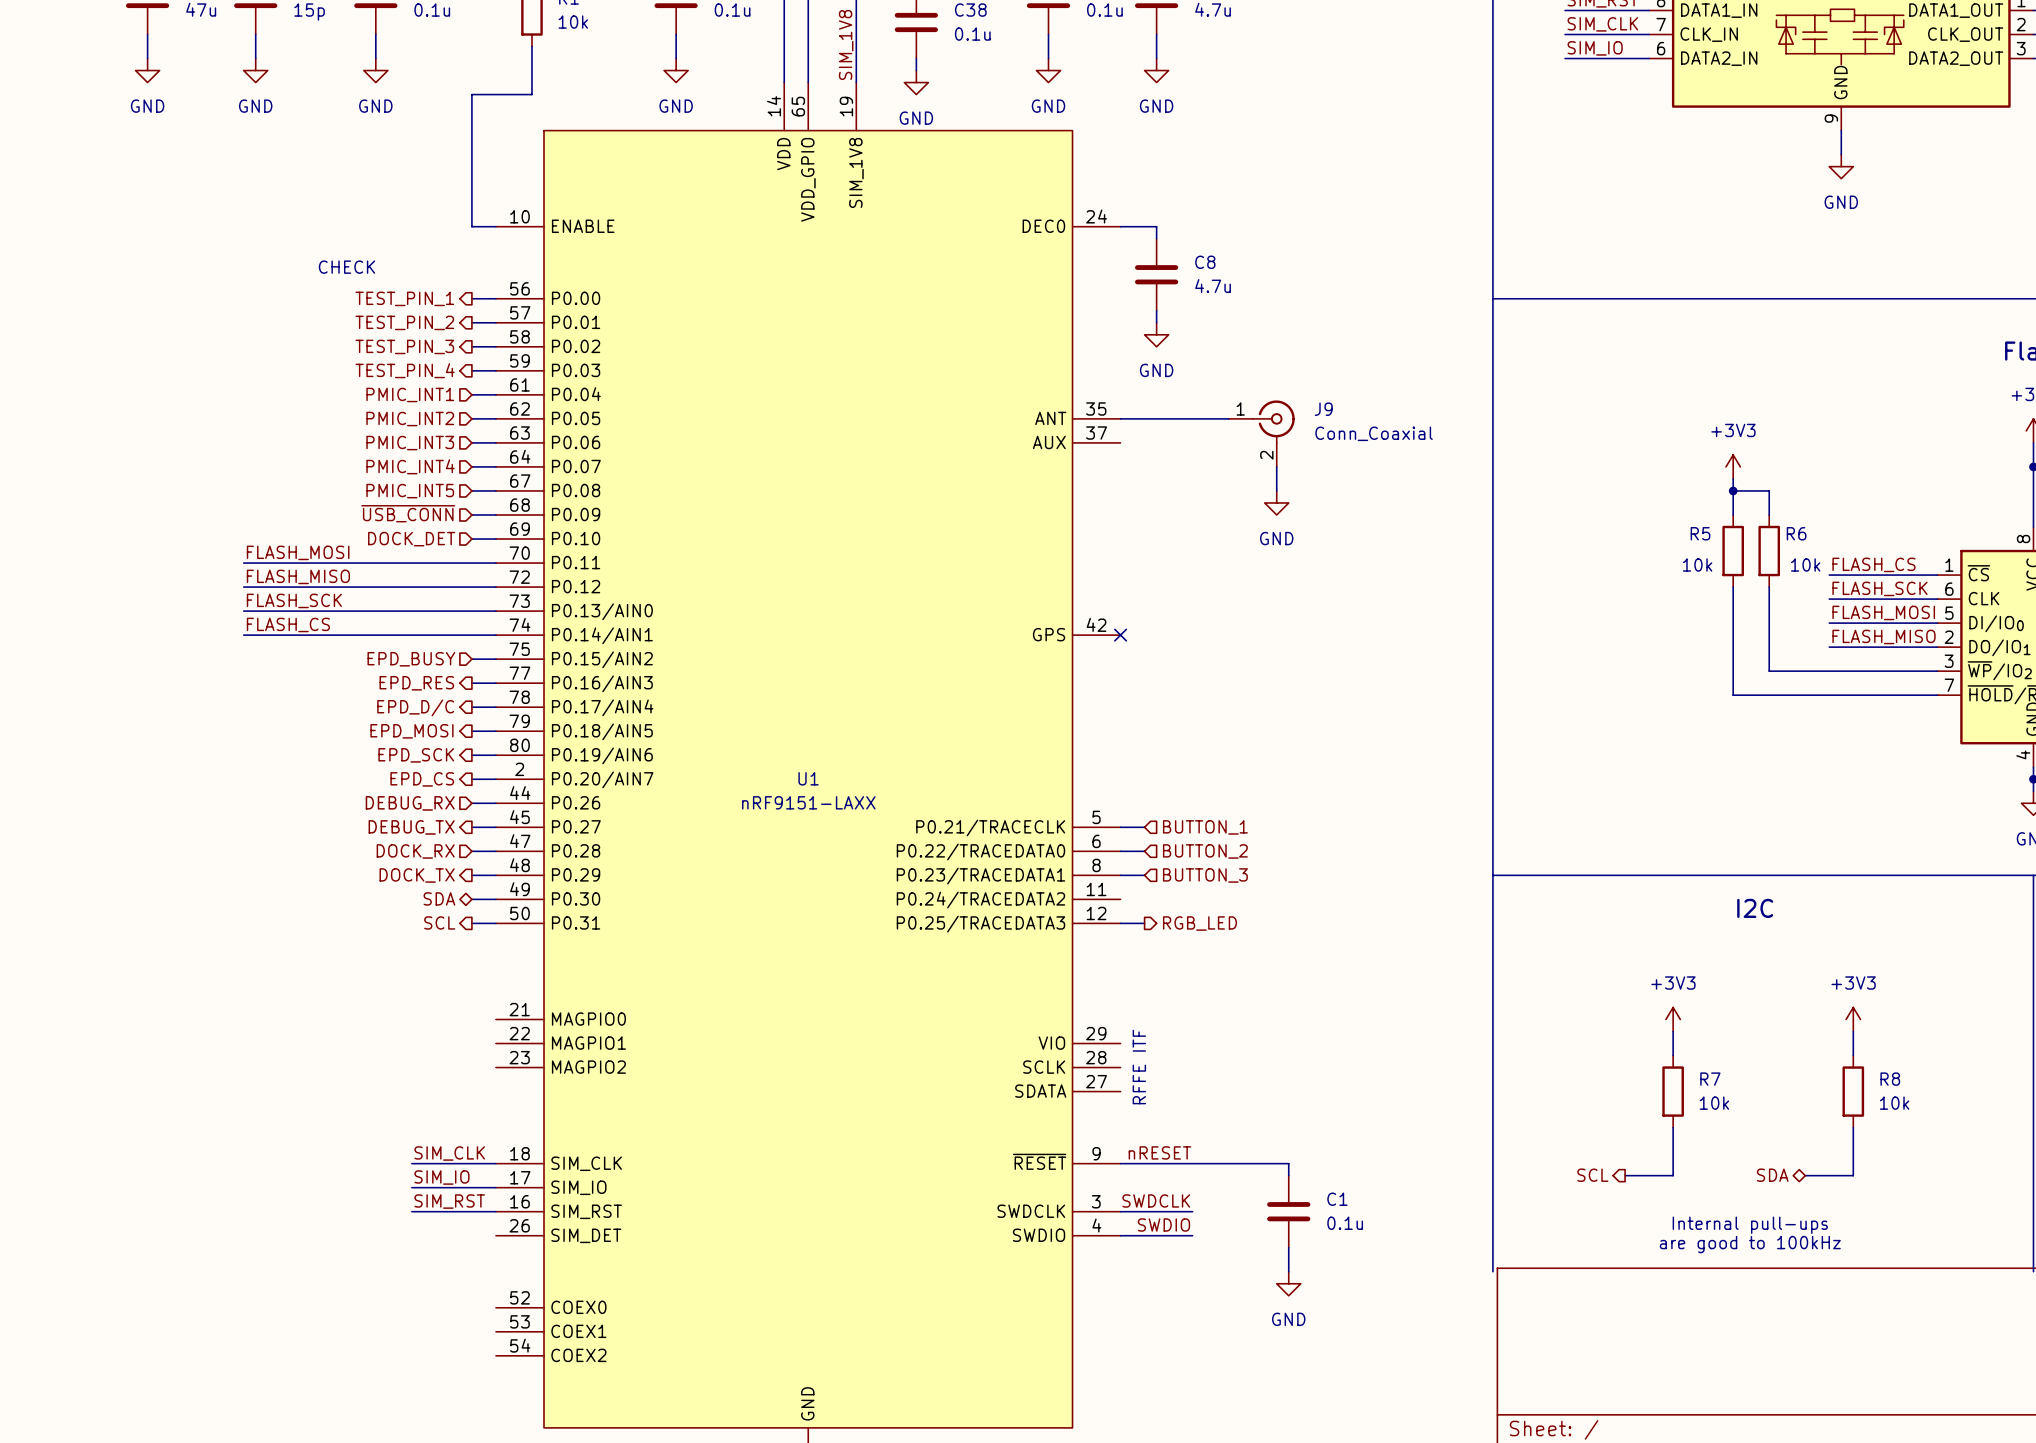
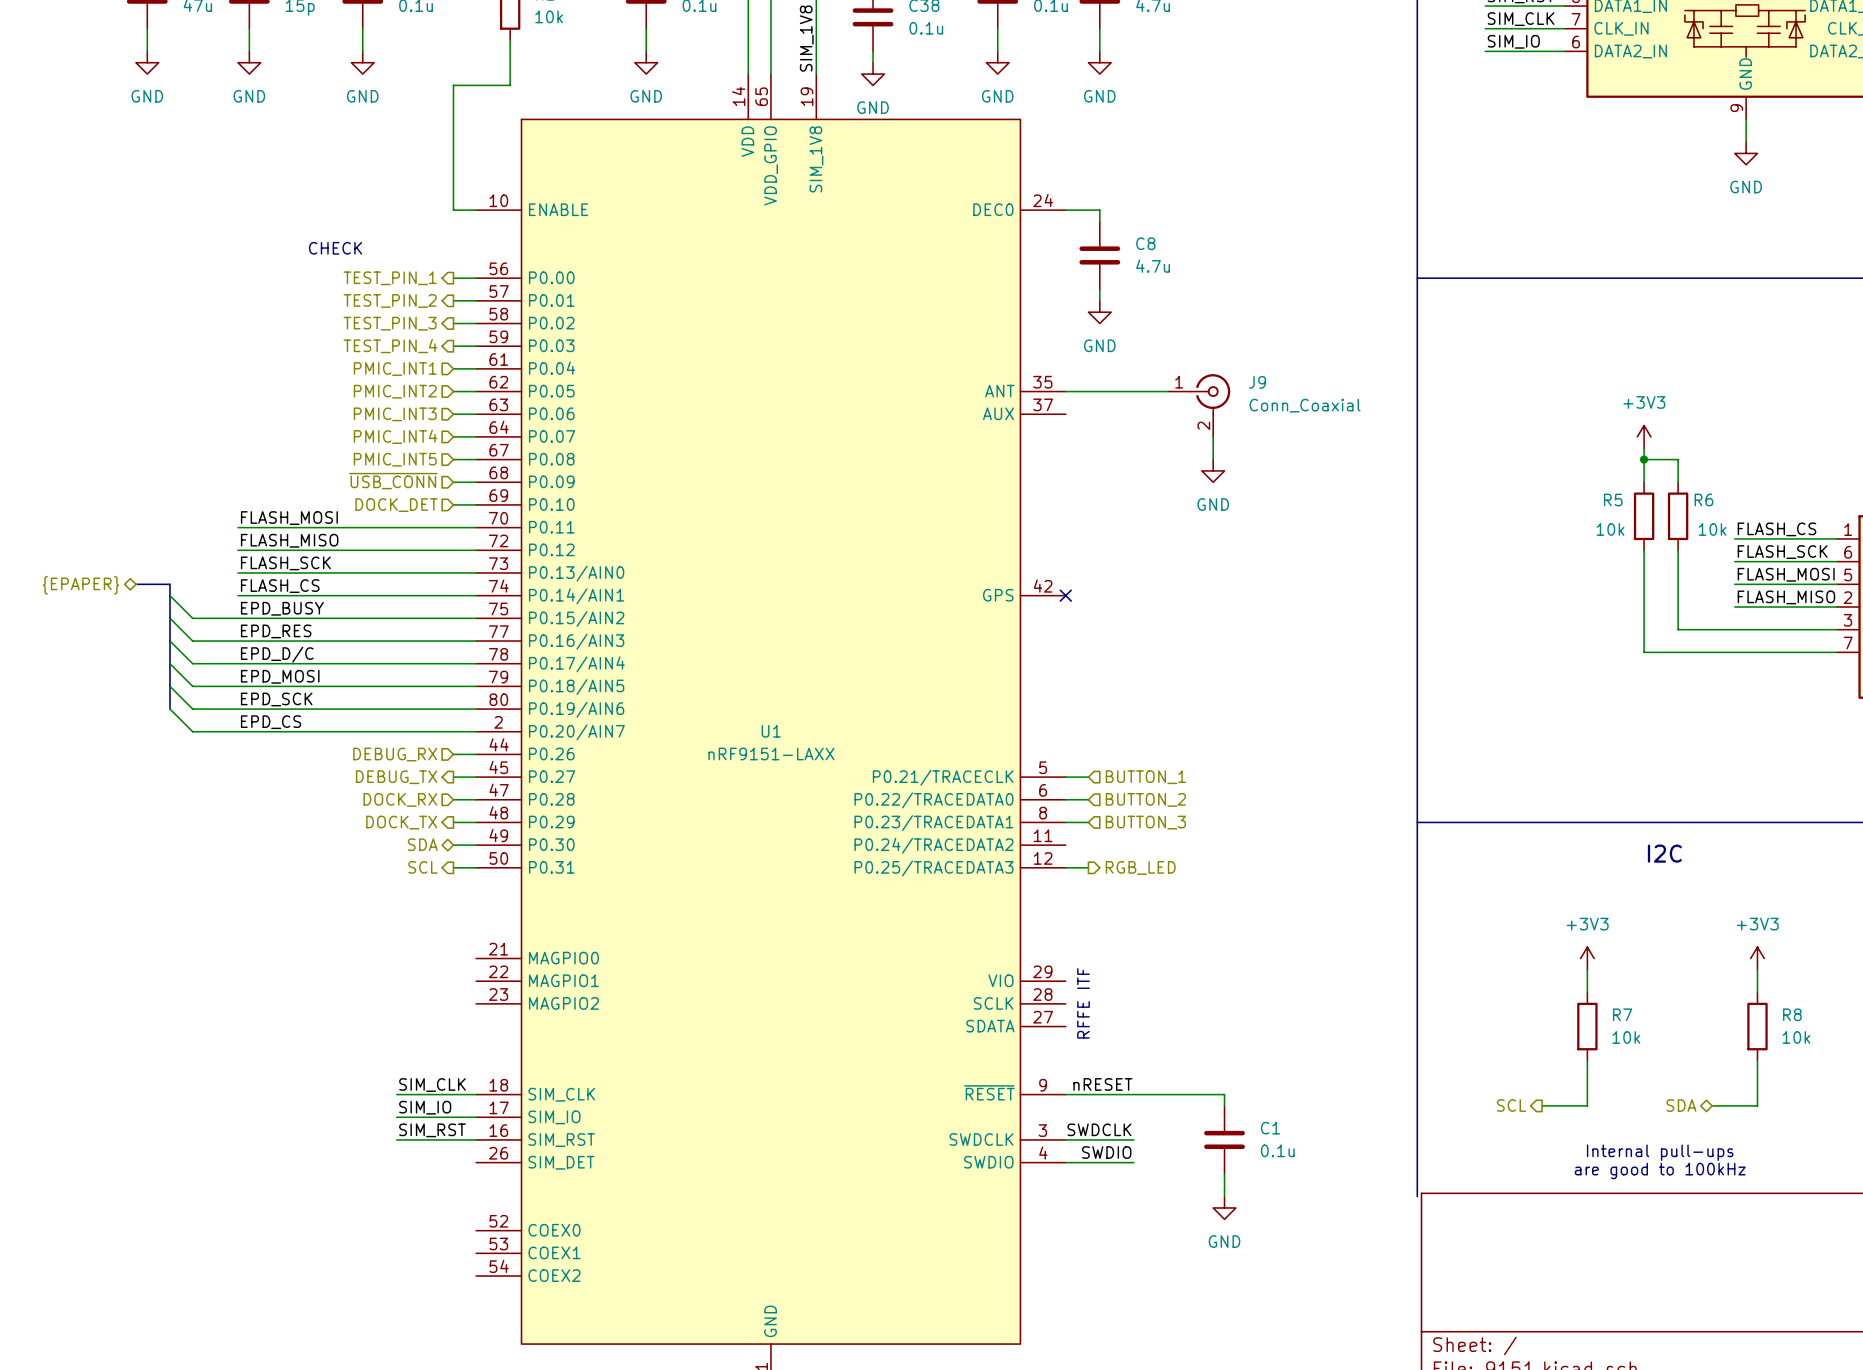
bus: none -> (135, 584) (169, 584) (169, 709)
hierarchical label: none -> {EPAPER} (80, 585)
wire: none -> (169, 595) (192, 618) (453, 618)
label: none -> EPD_BUSY (282, 608)
wire: none -> (169, 618) (192, 641) (453, 641)
hierarchical label: EPD_BUSY (411, 659) -> none
label: none -> EPD_RES (276, 631)
wire: none -> (169, 641) (192, 663) (453, 663)
hierarchical label: EPD_RES (416, 683) -> none
label: none -> EPD_D/C (277, 654)
wire: none -> (169, 663) (192, 686) (453, 686)
hierarchical label: EPD_D/C (415, 707) -> none
label: none -> EPD_MOSI (280, 676)
wire: none -> (169, 686) (192, 709) (453, 709)
hierarchical label: EPD_MOSI (411, 731) -> none
label: none -> EPD_SCK (276, 699)
wire: none -> (169, 709) (192, 731) (453, 731)
hierarchical label: EPD_SCK (416, 755) -> none
label: none -> EPD_CS (271, 722)
hierarchical label: EPD_CS (422, 779) -> none

